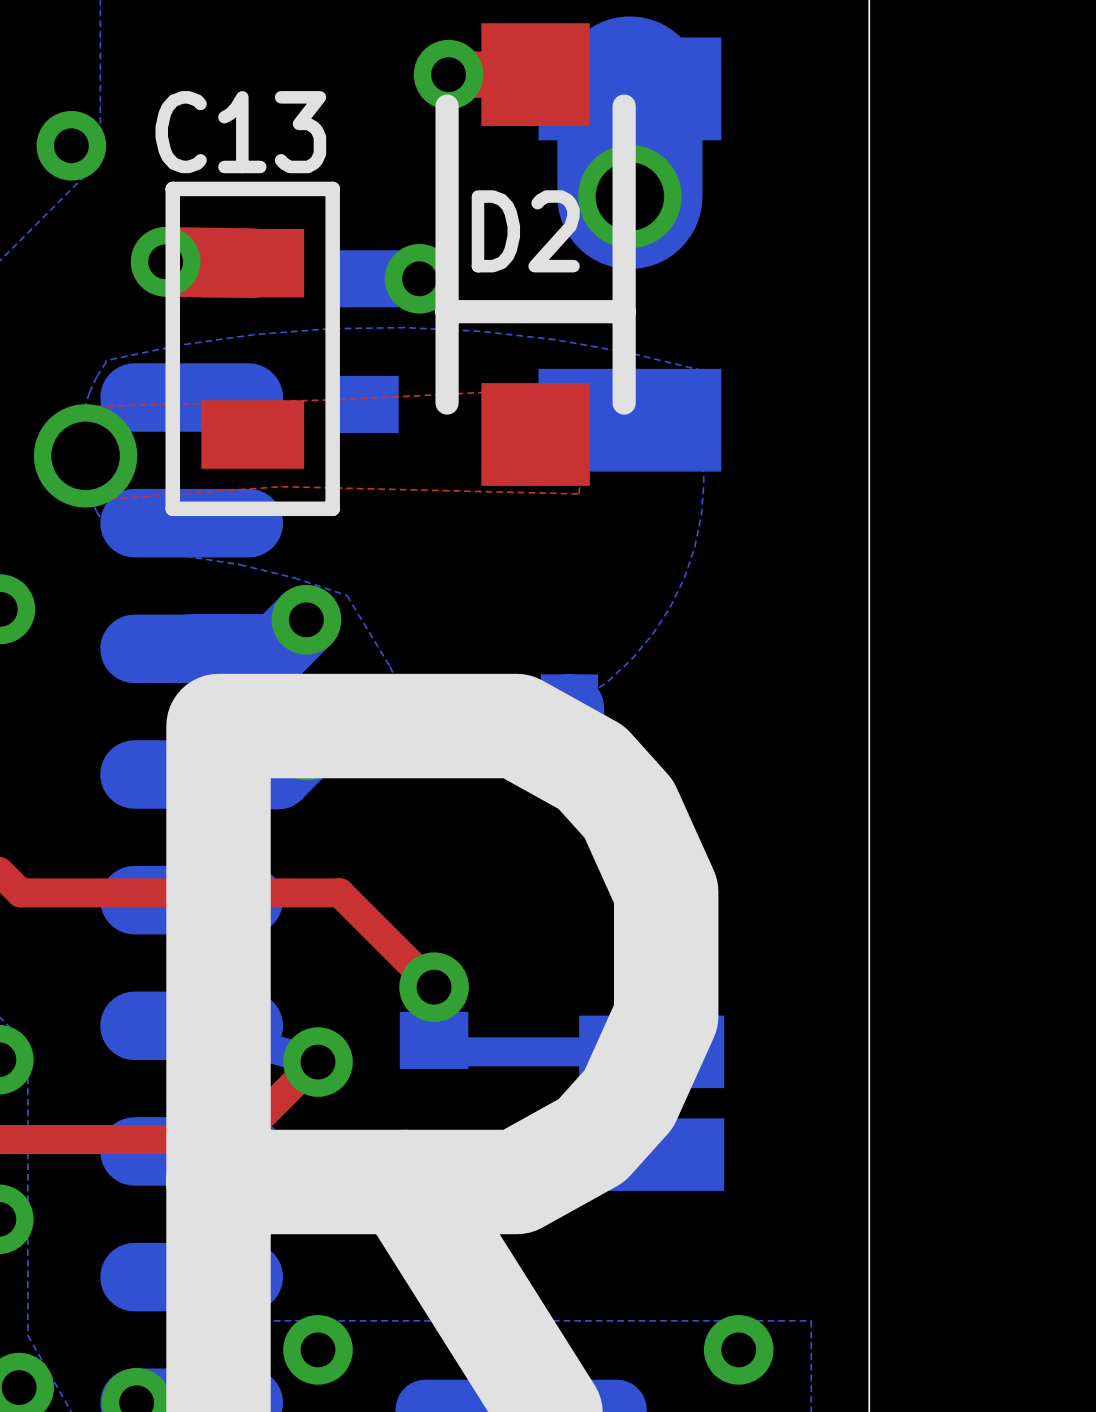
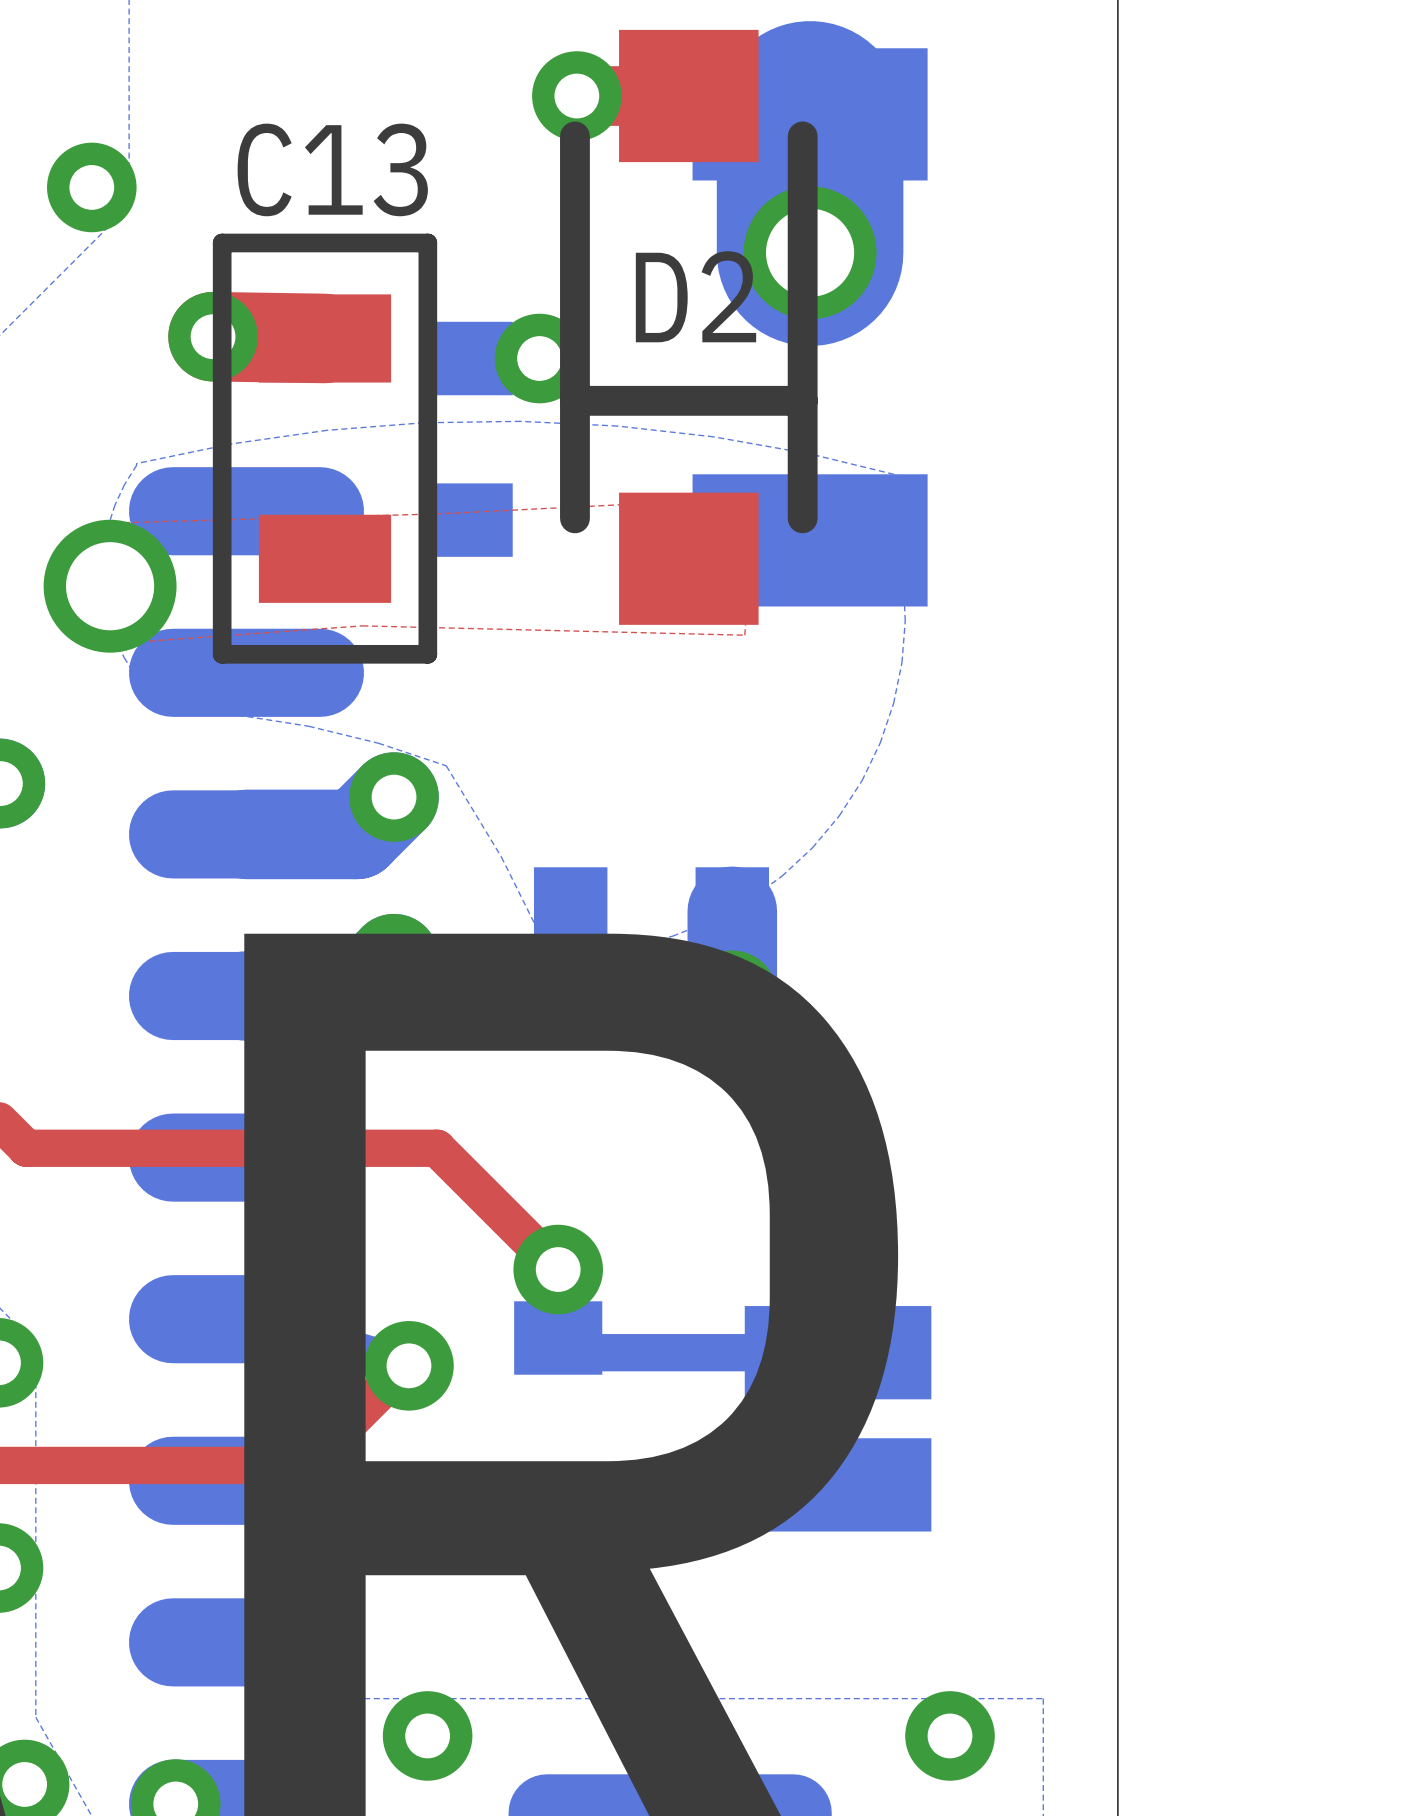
via position: (318, 1349) -> (427, 1735)

